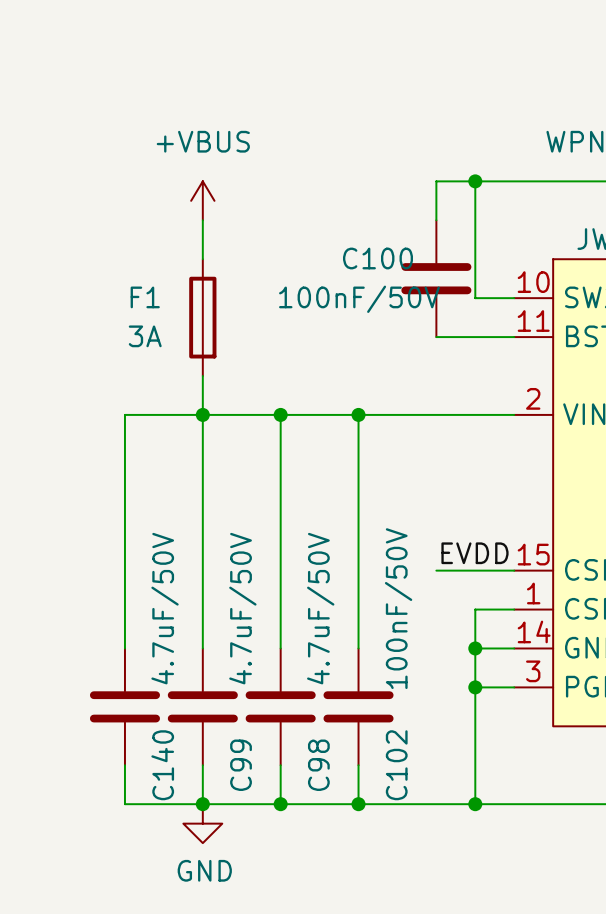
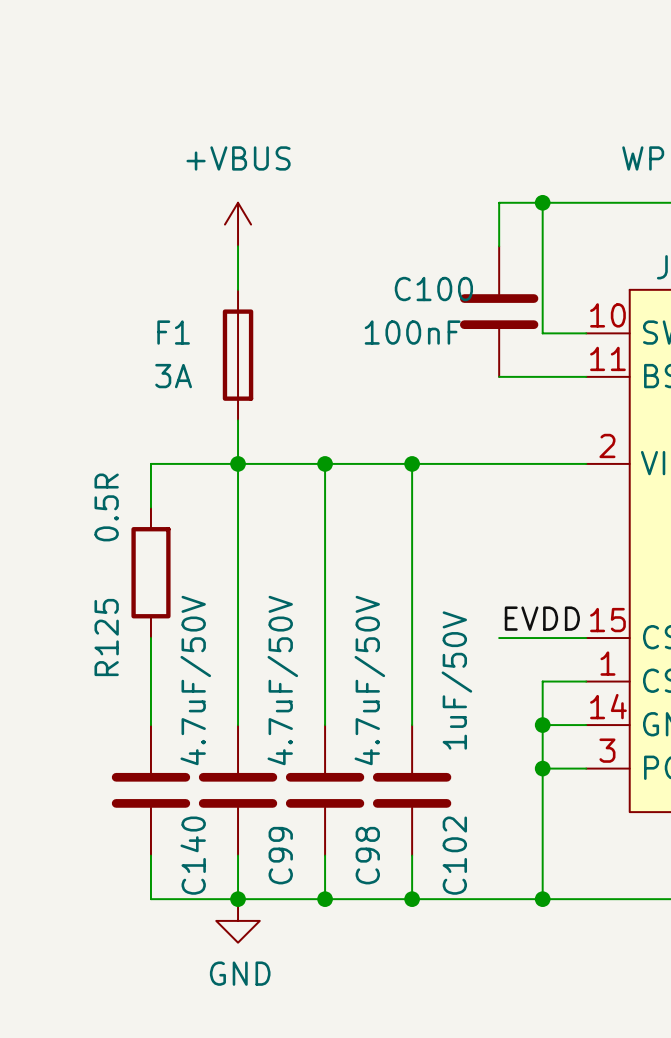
C100 value: 100nF/50V (359, 299) -> 100nF (412, 332)
wire: (124, 453) (124, 570) -> none
R125: none -> 0.5R (150, 572)
C102 value: 100nF/50V (398, 608) -> 1uF/50V (456, 680)

